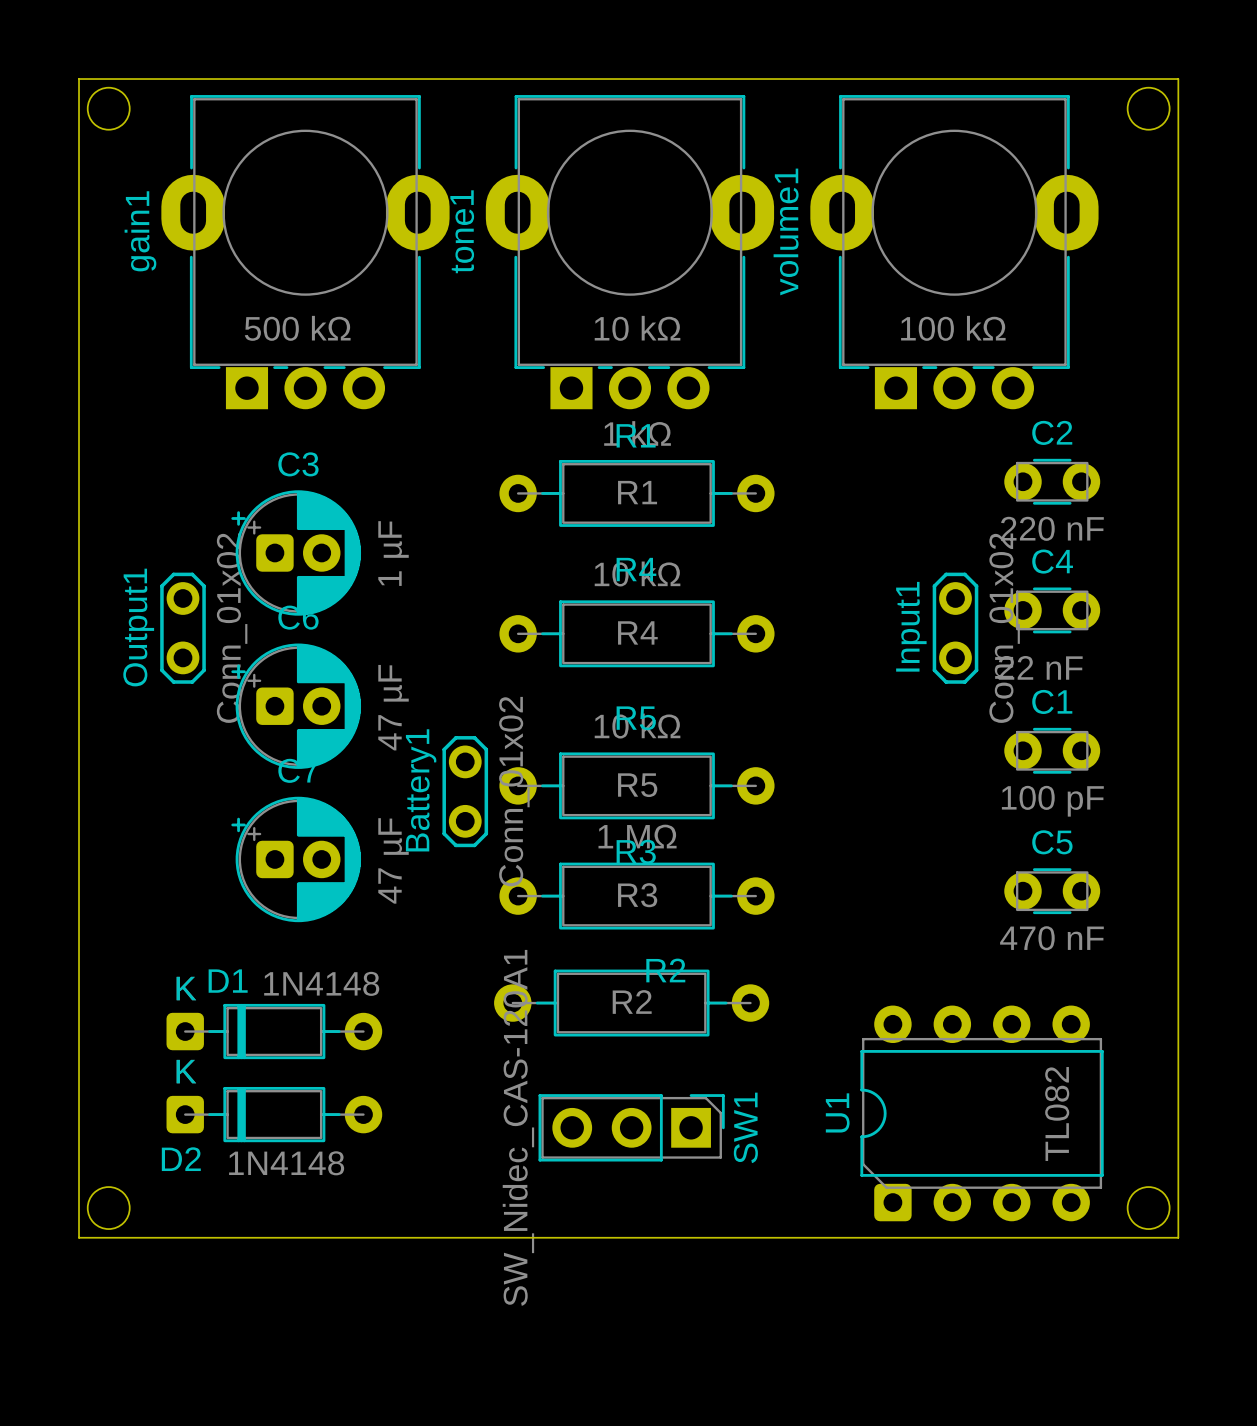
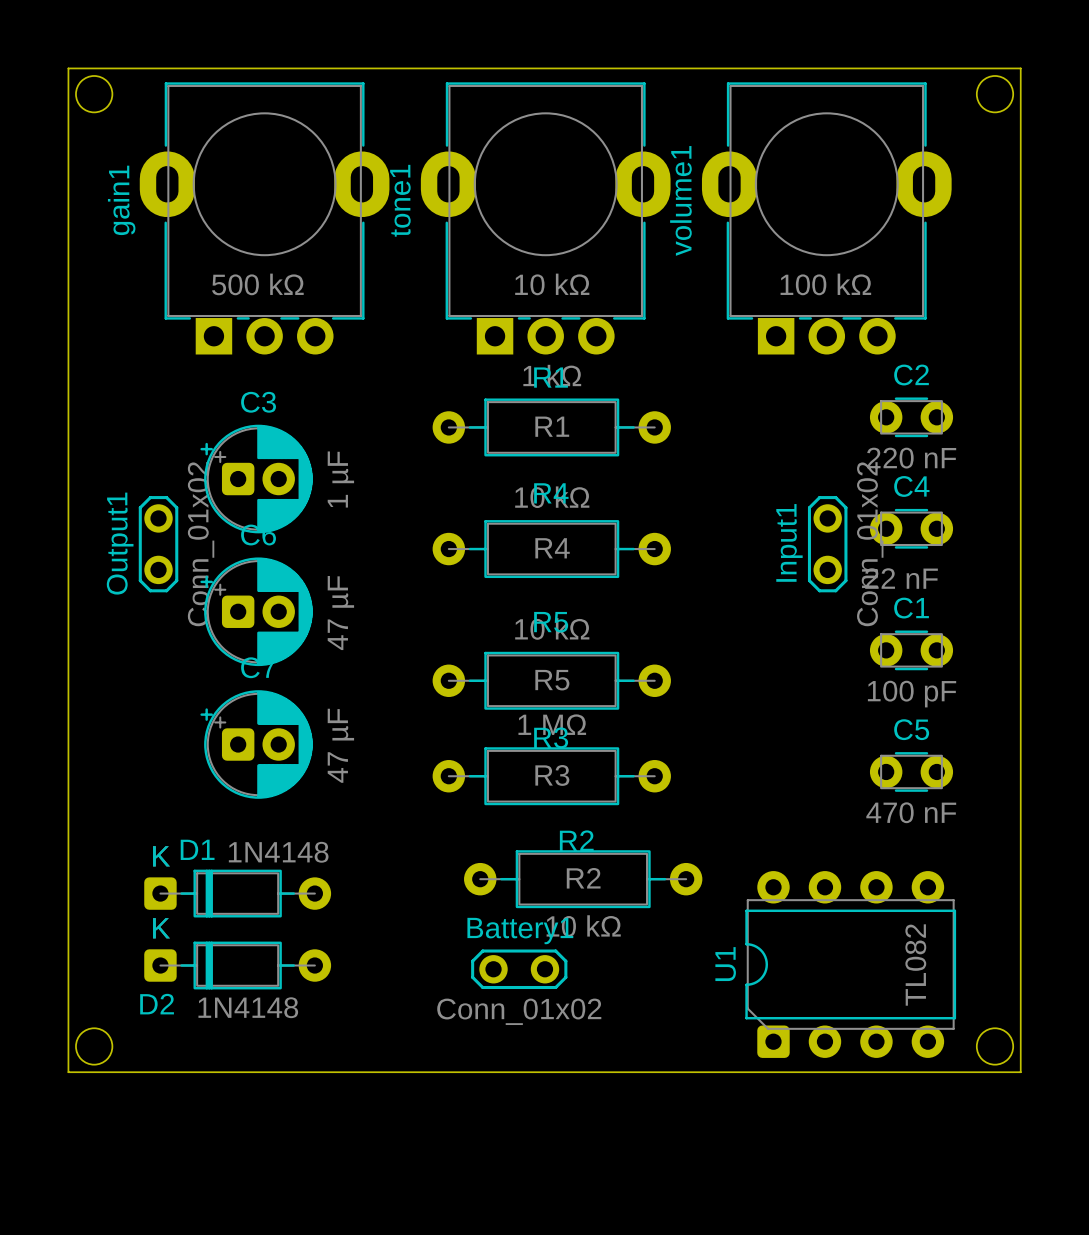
Battery1 rotation: 0° (465, 791) -> 90° clockwise (519, 969)
Battery1 position: (465, 791) -> (519, 969)
R2 position: (631, 1003) -> (583, 879)
R2 value: none -> 10 kΩ (583, 926)
SW1: SW_Nidec_CAS-120A1 (631, 1127) -> none

